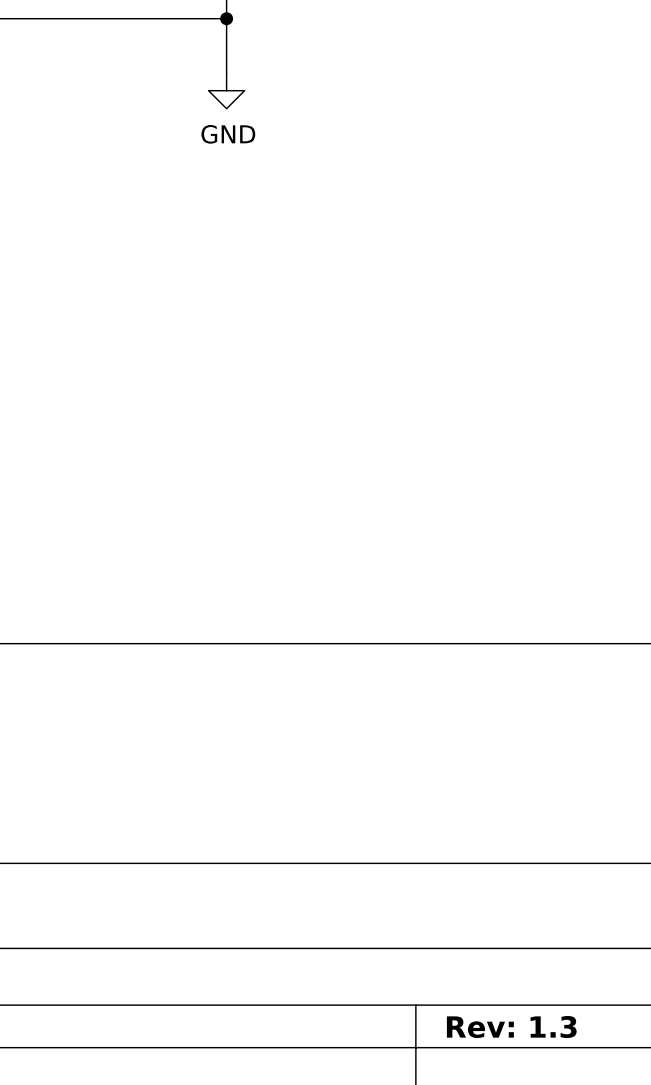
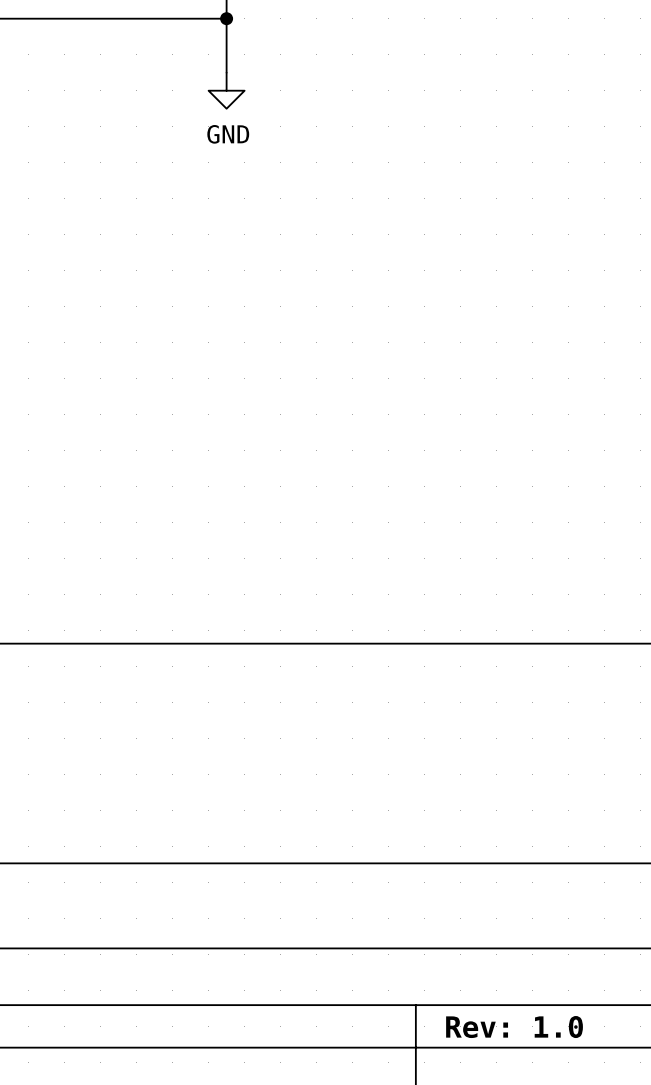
title block: Rev: 1.3 (511, 1027) -> Rev: 1.0 (514, 1027)

